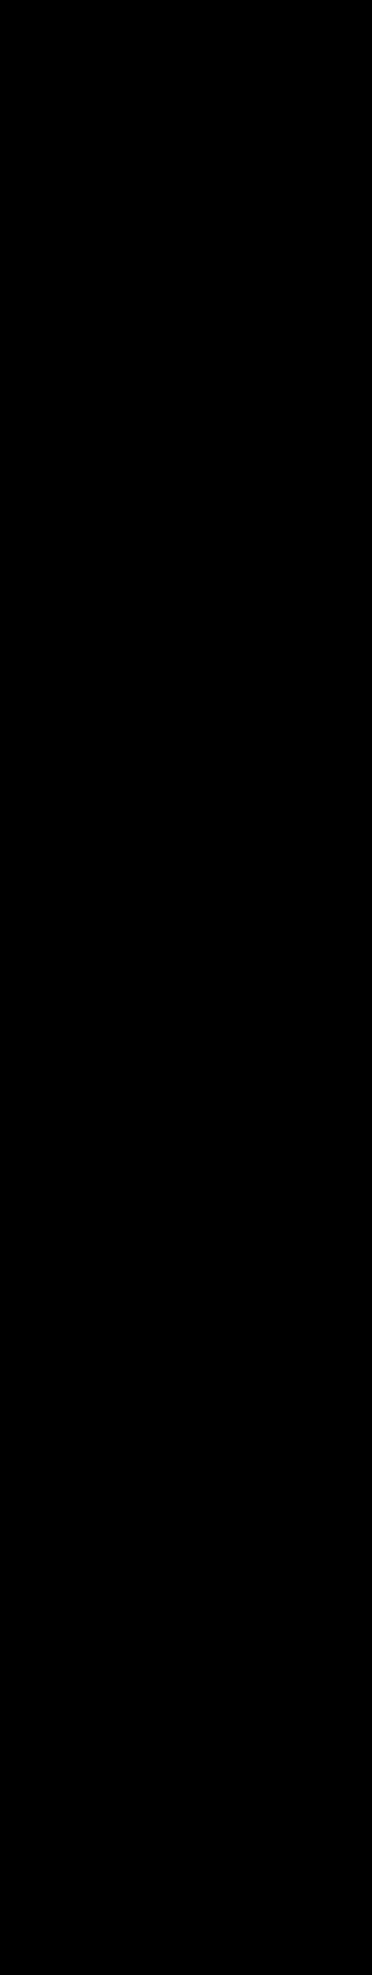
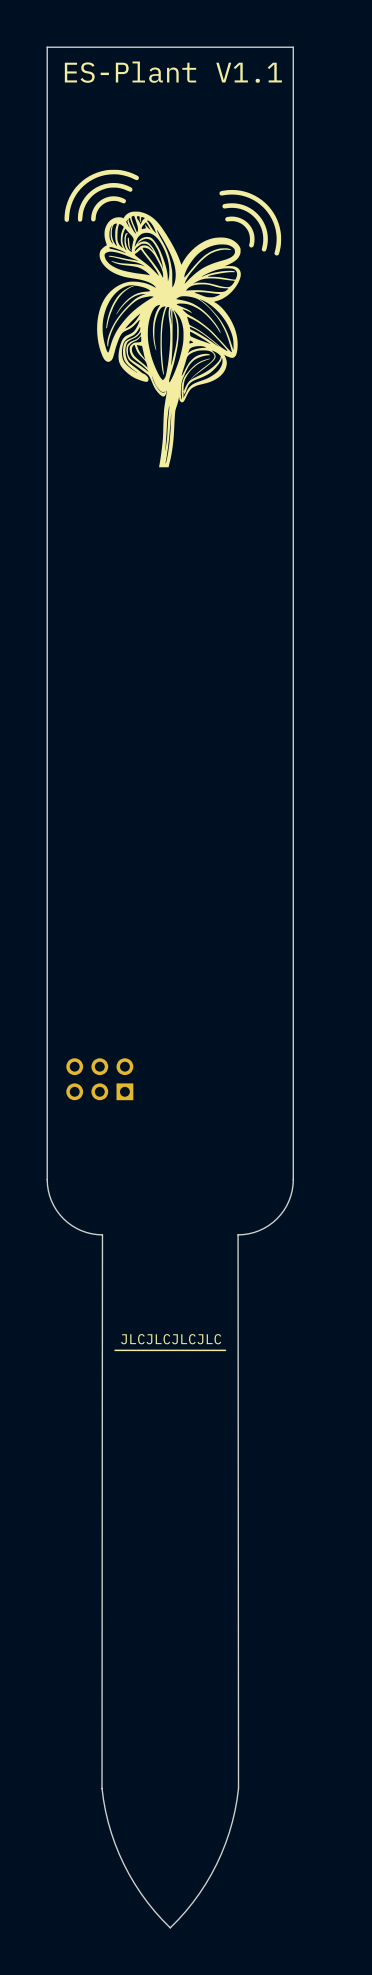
board edge: none -> (293, 47) (293, 1185) (286, 1205) (273, 1222) (254, 1232) (238, 1234) (238, 1788) (232, 1821) (216, 1864) (192, 1902) (170, 1927) (147, 1902) (123, 1864) (108, 1821) (102, 1788) (102, 1234) (86, 1232) (67, 1222) (53, 1205) (47, 1185) (47, 47) (293, 47)
text: none -> ES-Plant V1.1 (173, 72)
drawing: none -> [64, 169, 282, 468]
part: none -> (99, 1079)
text: none -> JLCJLCJLCJLC (171, 1339)
line: none -> (225, 1350) (115, 1350)

